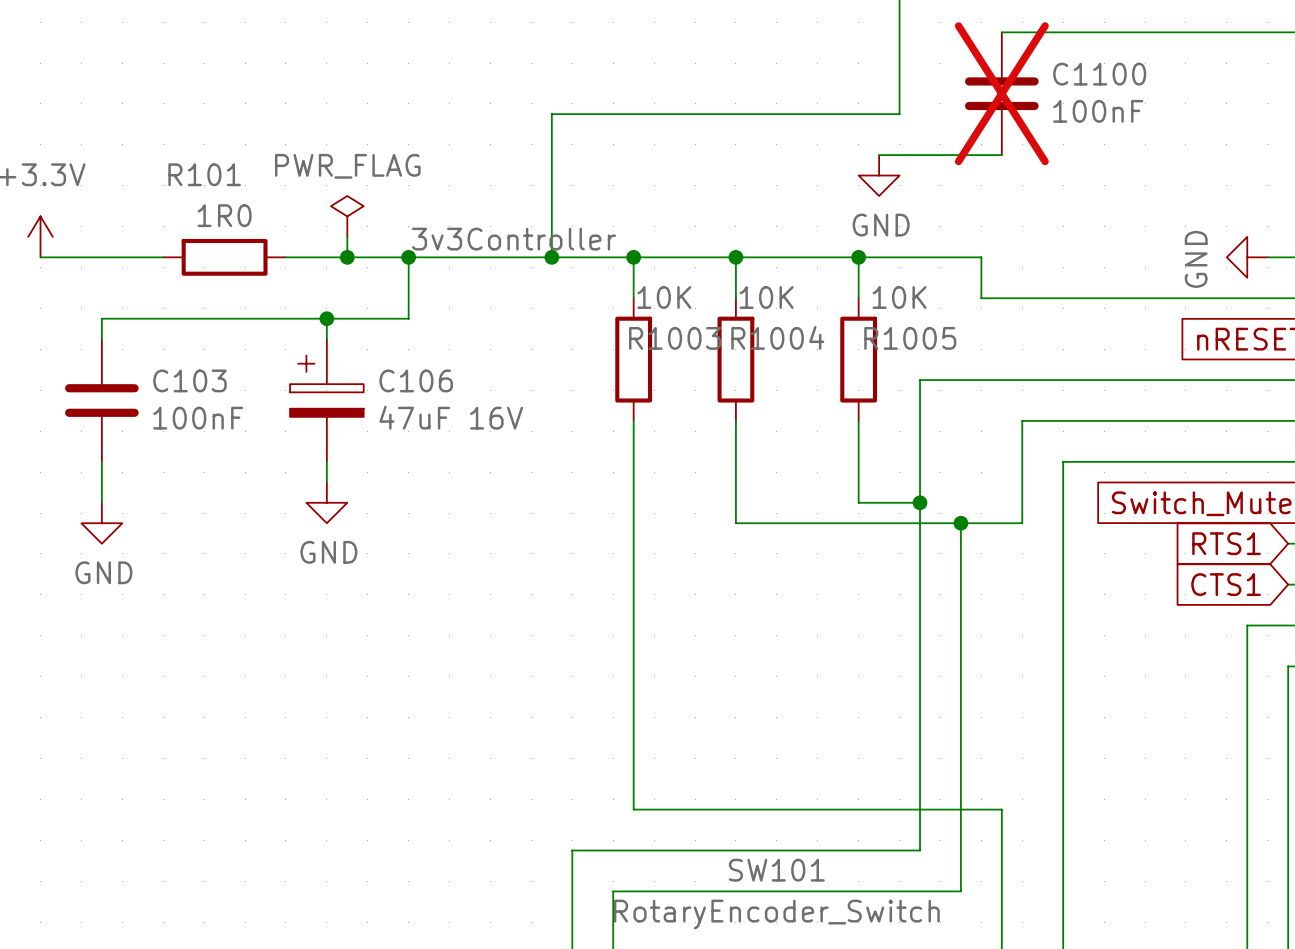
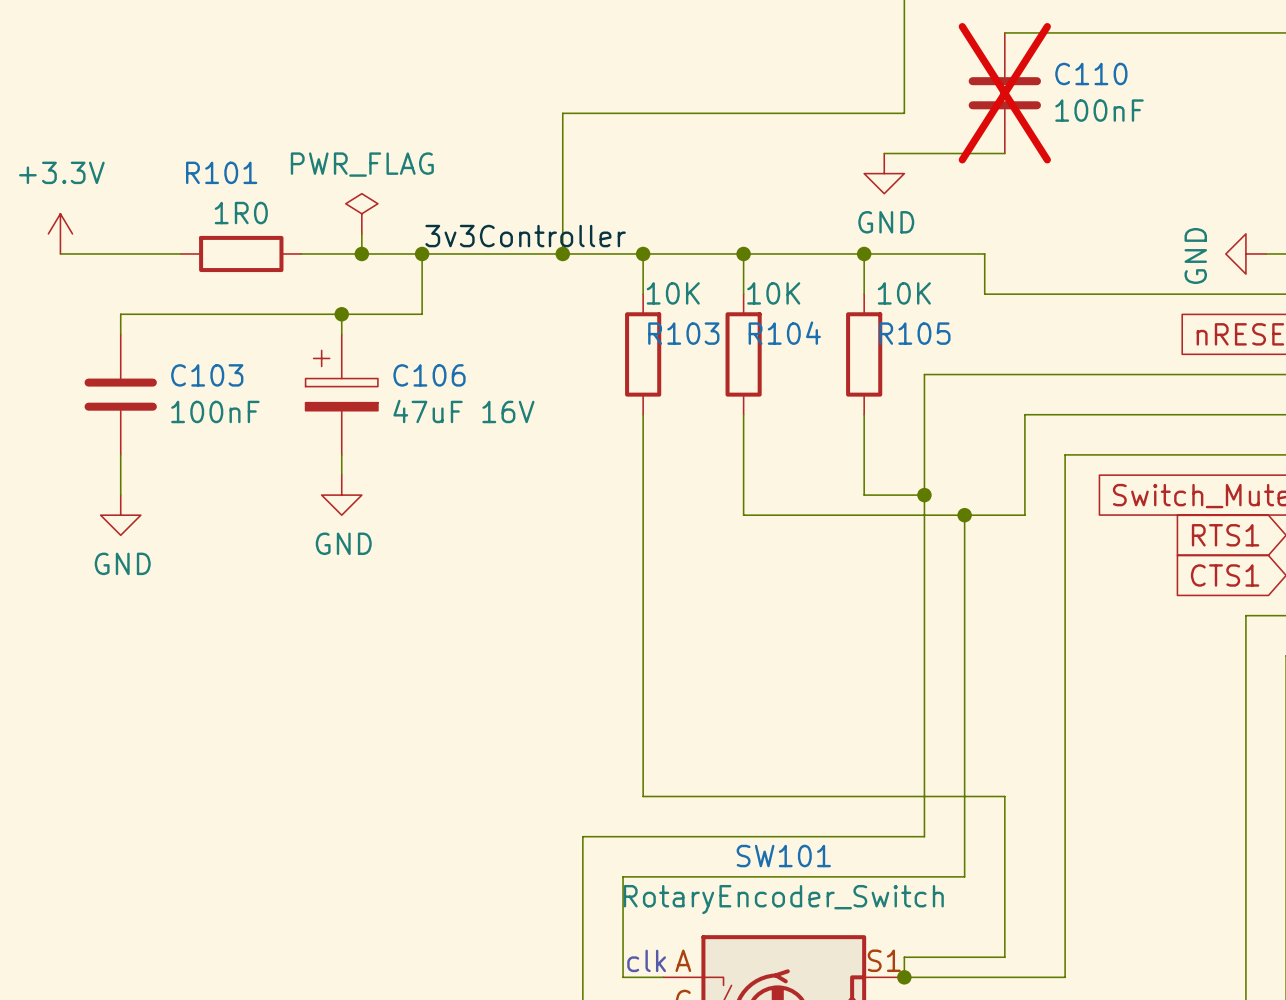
C1100 name: C1100 (1099, 74) -> C110 (1091, 74)
R1004 name: R1004 (777, 337) -> R104 (784, 333)
R1003 name: R1003 (675, 338) -> R103 (683, 333)
R1005 name: R1005 (910, 338) -> R105 (914, 333)

